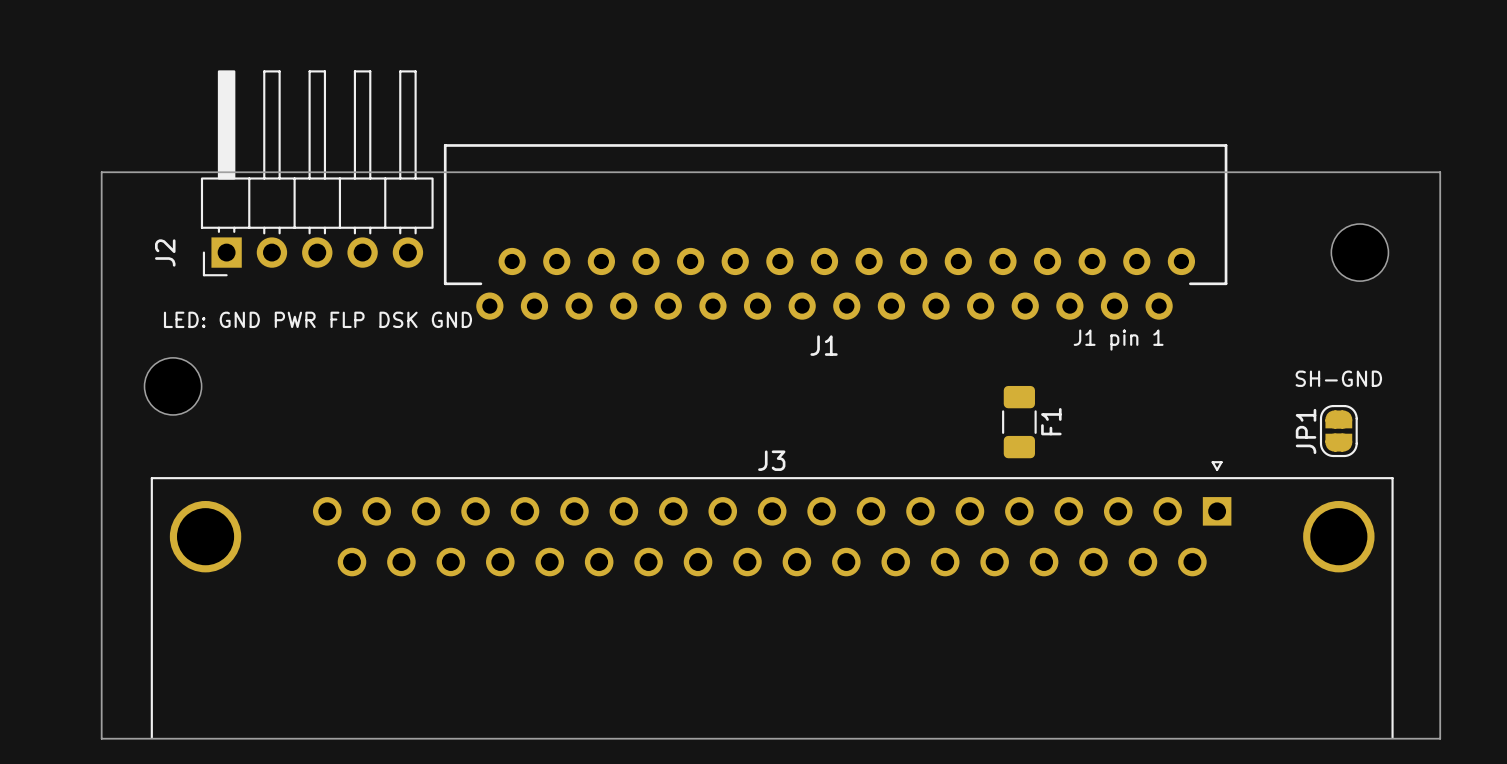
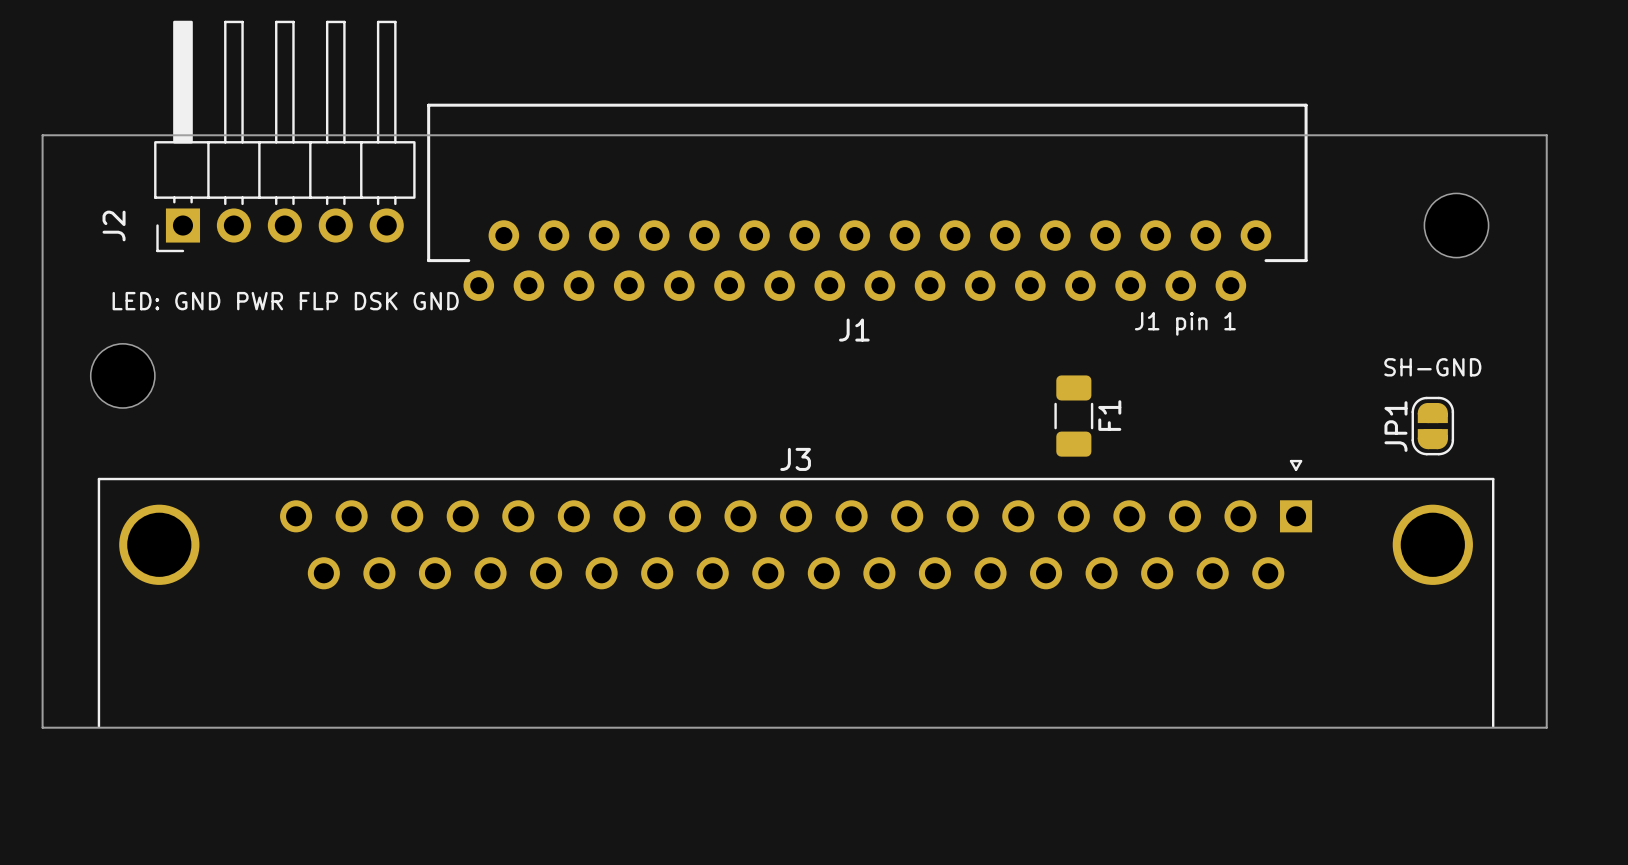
J3 footprint: [150, 461, 1394, 739] -> [97, 459, 1495, 728]
board edge: (101, 699) (101, 738) (1440, 738) (1440, 699) -> (42, 727) (1546, 727)

